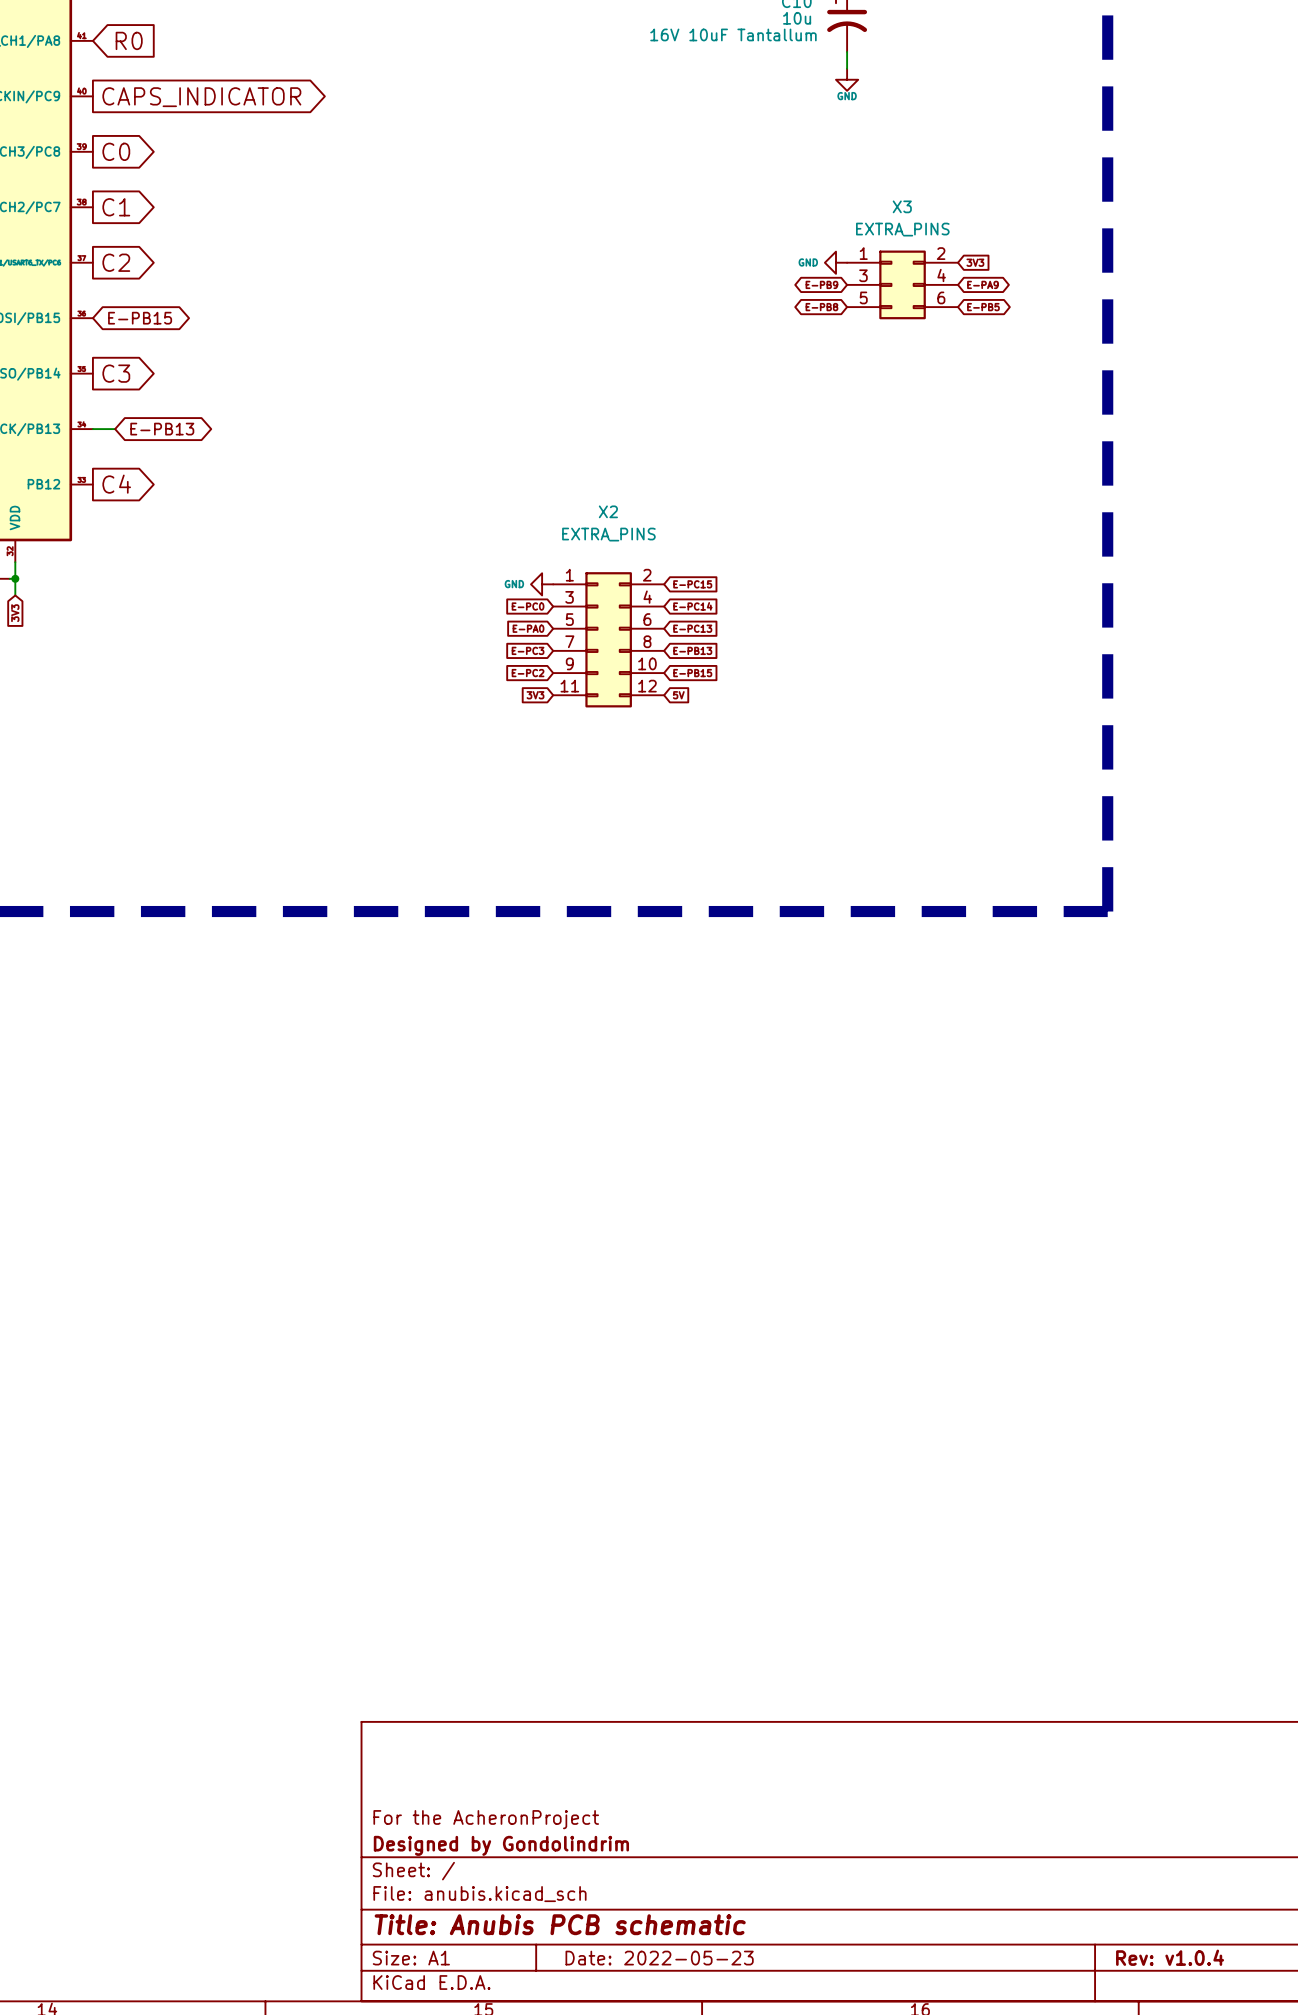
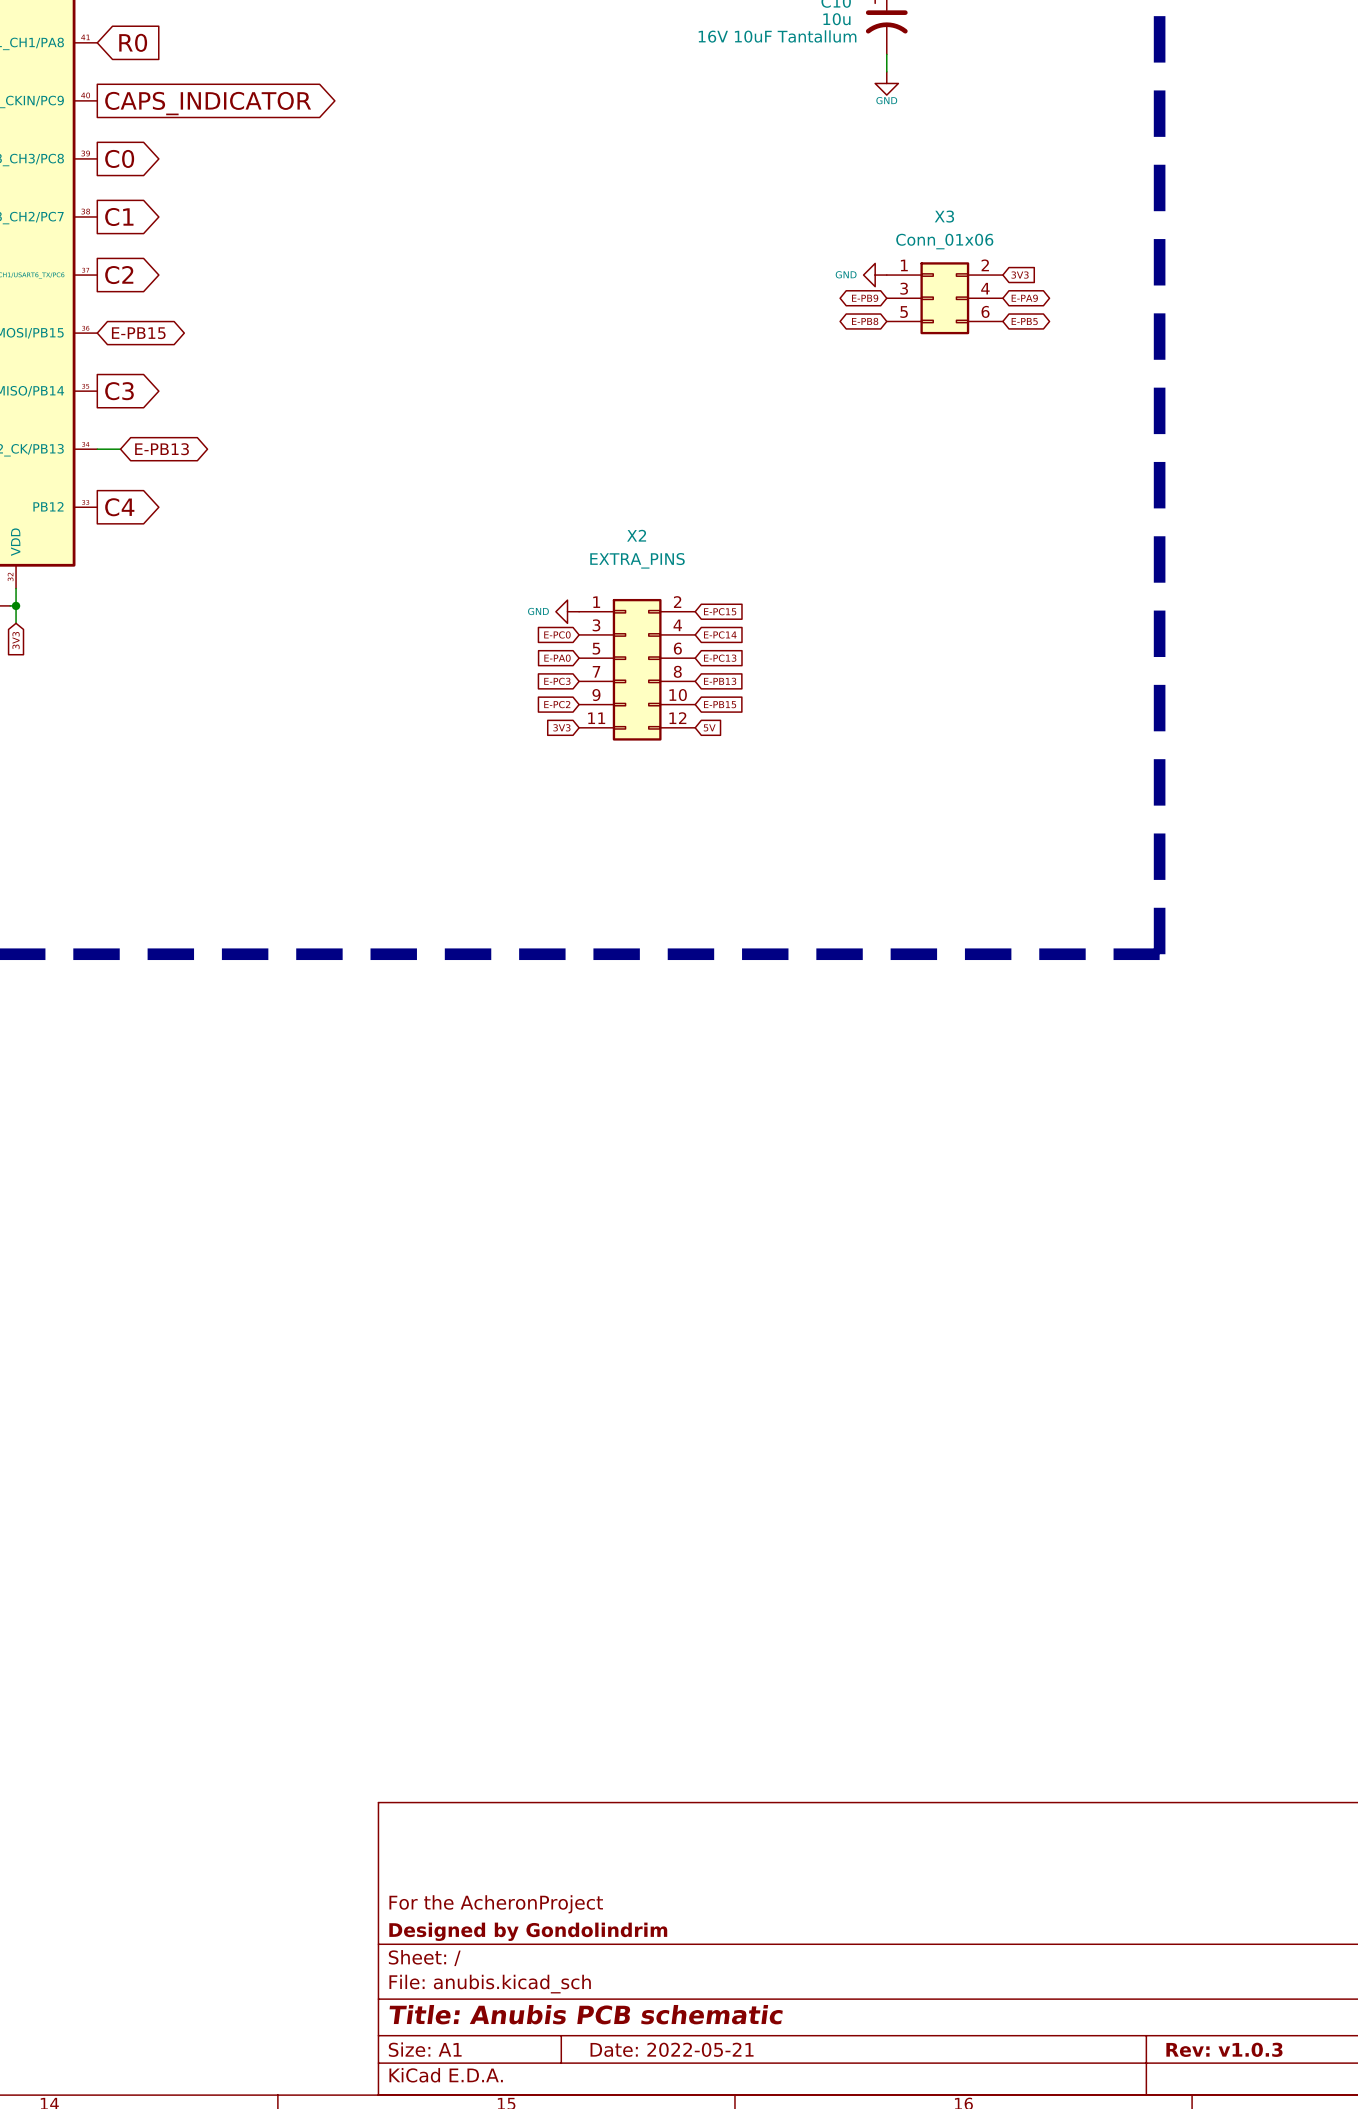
X3 value: EXTRA_PINS (902, 229) -> Conn_01x06 (944, 241)
title block: Rev: v1.0.4 (1170, 1957) -> Rev: v1.0.3 (1224, 2049)
title block: Date: 2022-05-23 (659, 1958) -> Date: 2022-05-21 (672, 2049)

